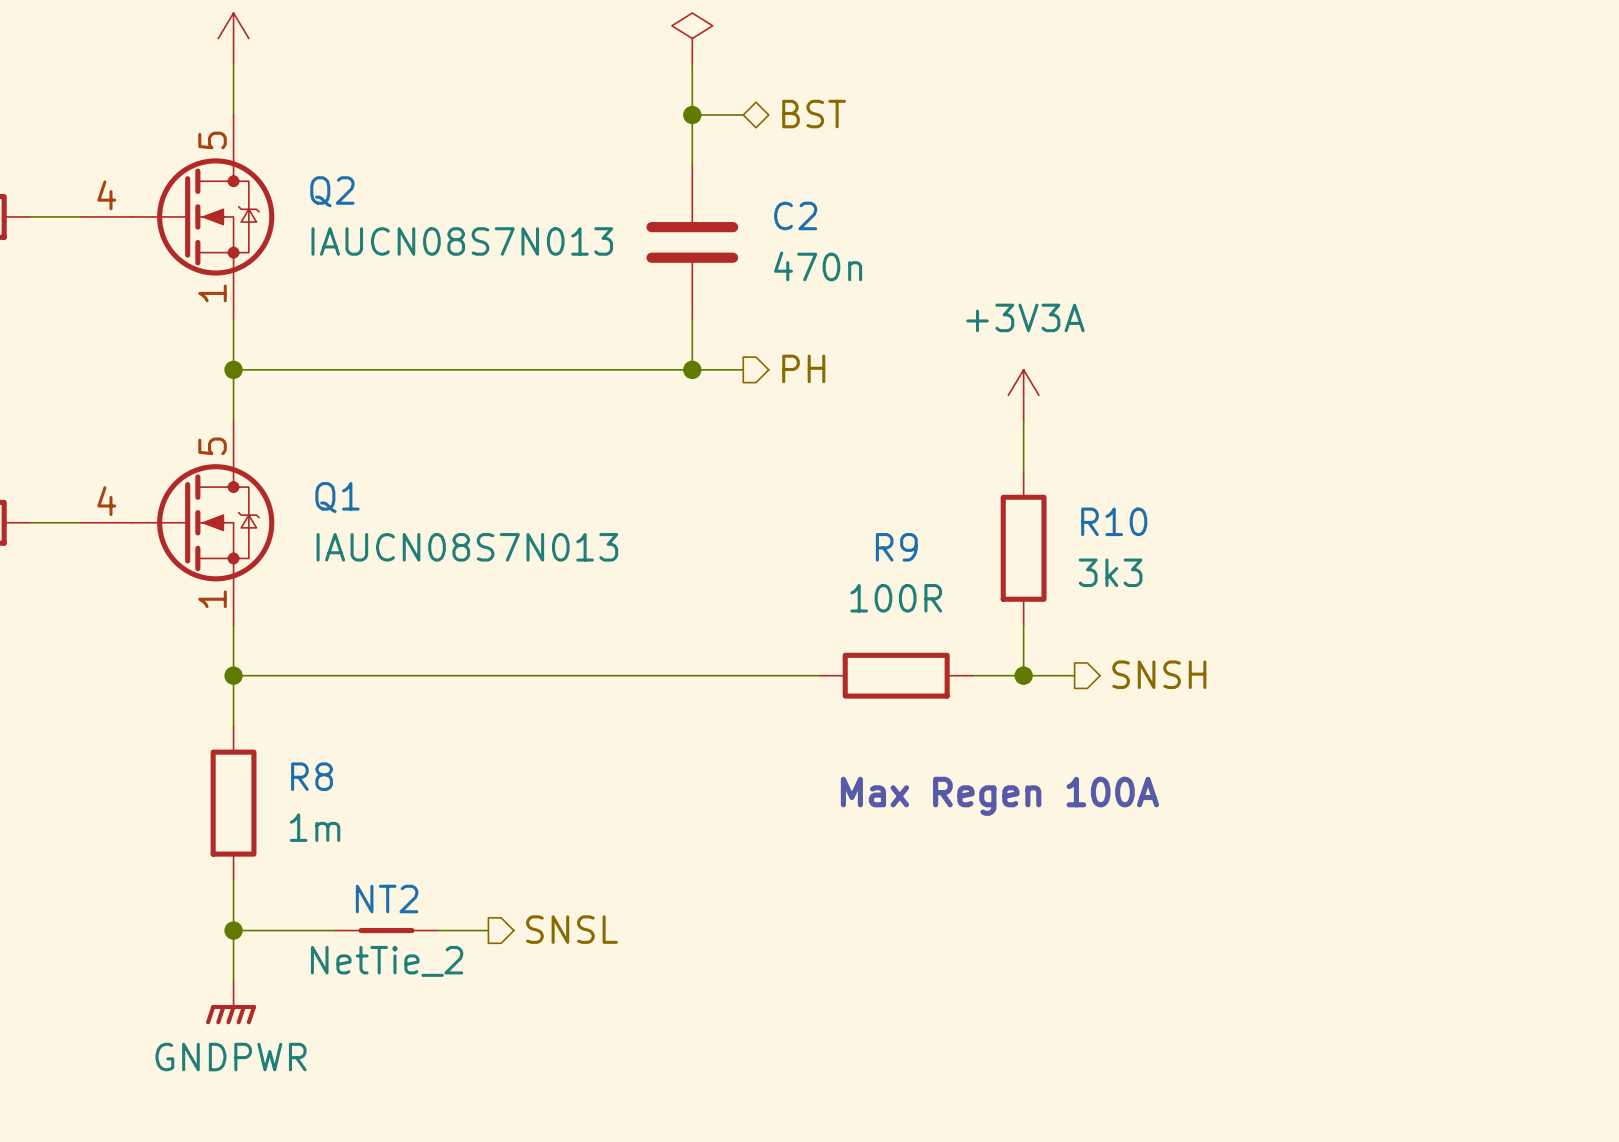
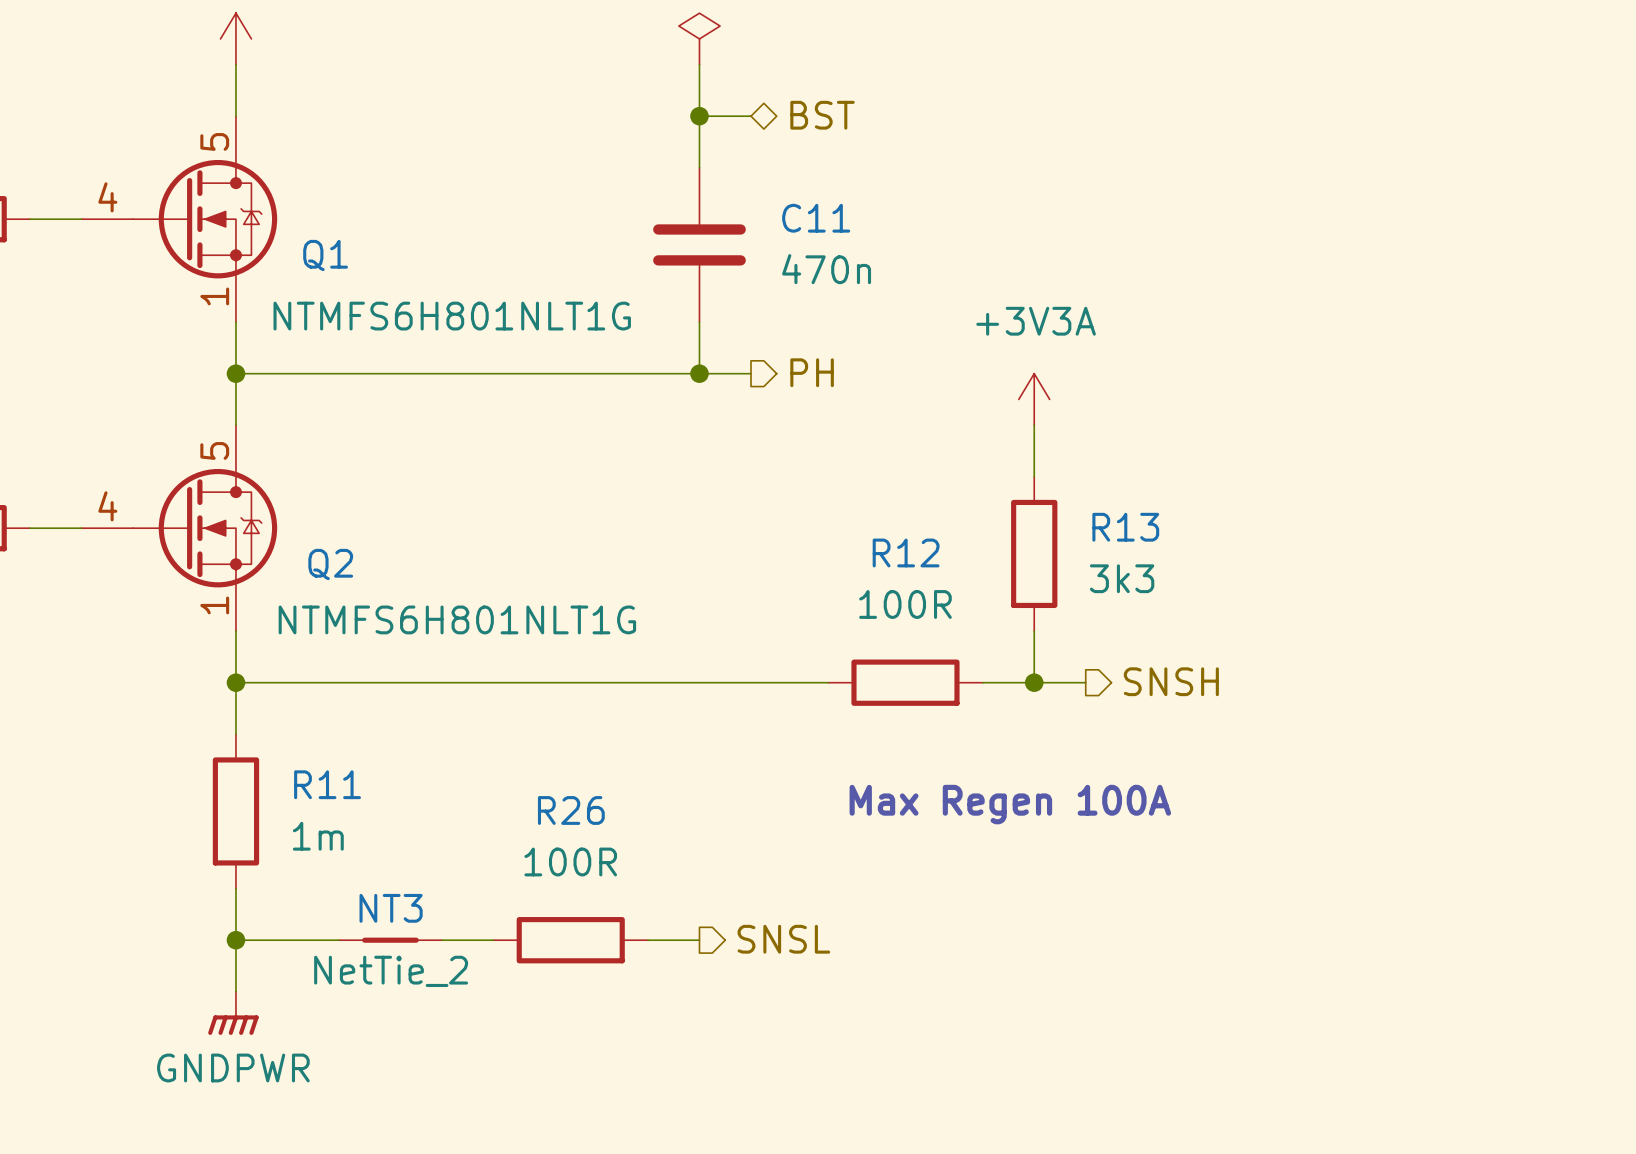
Q2 name: Q2 (332, 191) -> Q1 (325, 255)
C2 name: C2 (795, 215) -> C11 (816, 218)
Q2 value: IAUCN08S7N013 (462, 241) -> NTMFS6H801NLT1G (452, 316)
Q1 name: Q1 (337, 497) -> Q2 (330, 564)
R10 name: R10 (1114, 521) -> R13 (1125, 527)
Q1 value: IAUCN08S7N013 (467, 547) -> NTMFS6H801NLT1G (457, 619)
R9 name: R9 (896, 547) -> R12 (906, 552)
R8 name: R8 (312, 776) -> R11 (327, 784)
NT2 name: NT2 (387, 899) -> NT3 (391, 908)
hierarchical label position: SNSL (571, 929) -> SNSL (783, 939)
R26: none -> 100R (570, 940)
wire: none -> (647, 940) (699, 940)

